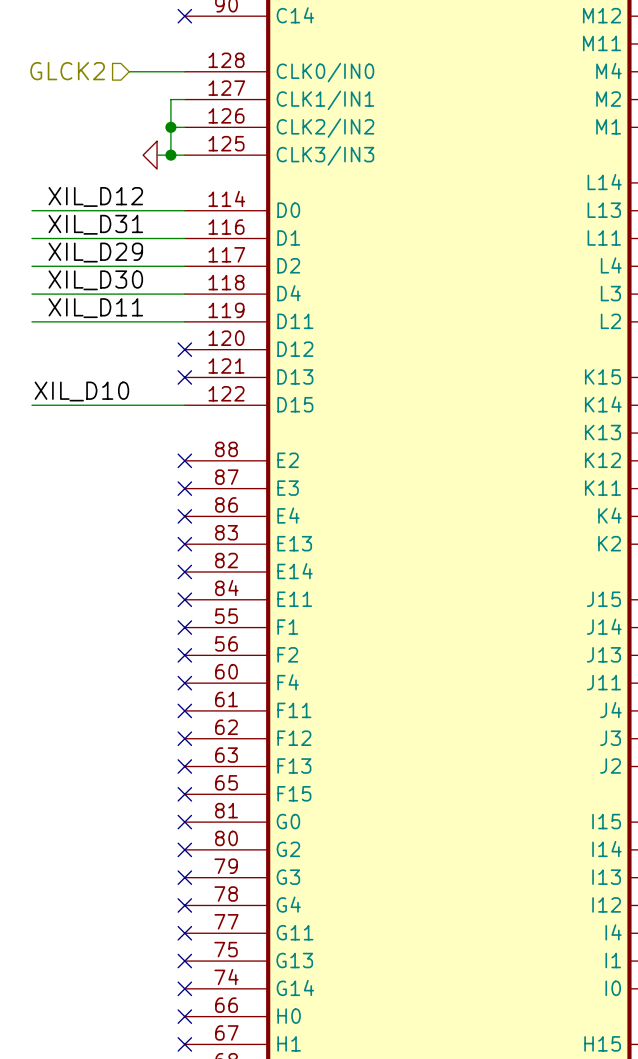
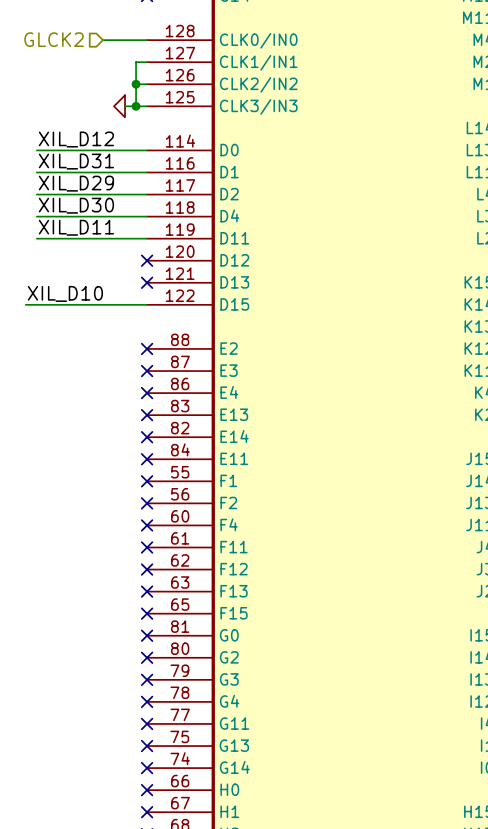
wire: (31, 210) (45, 210) -> none
wire: (31, 238) (45, 238) -> none
wire: (31, 266) (45, 266) -> none
wire: (31, 294) (45, 294) -> none
wire: (31, 321) (45, 321) -> none

